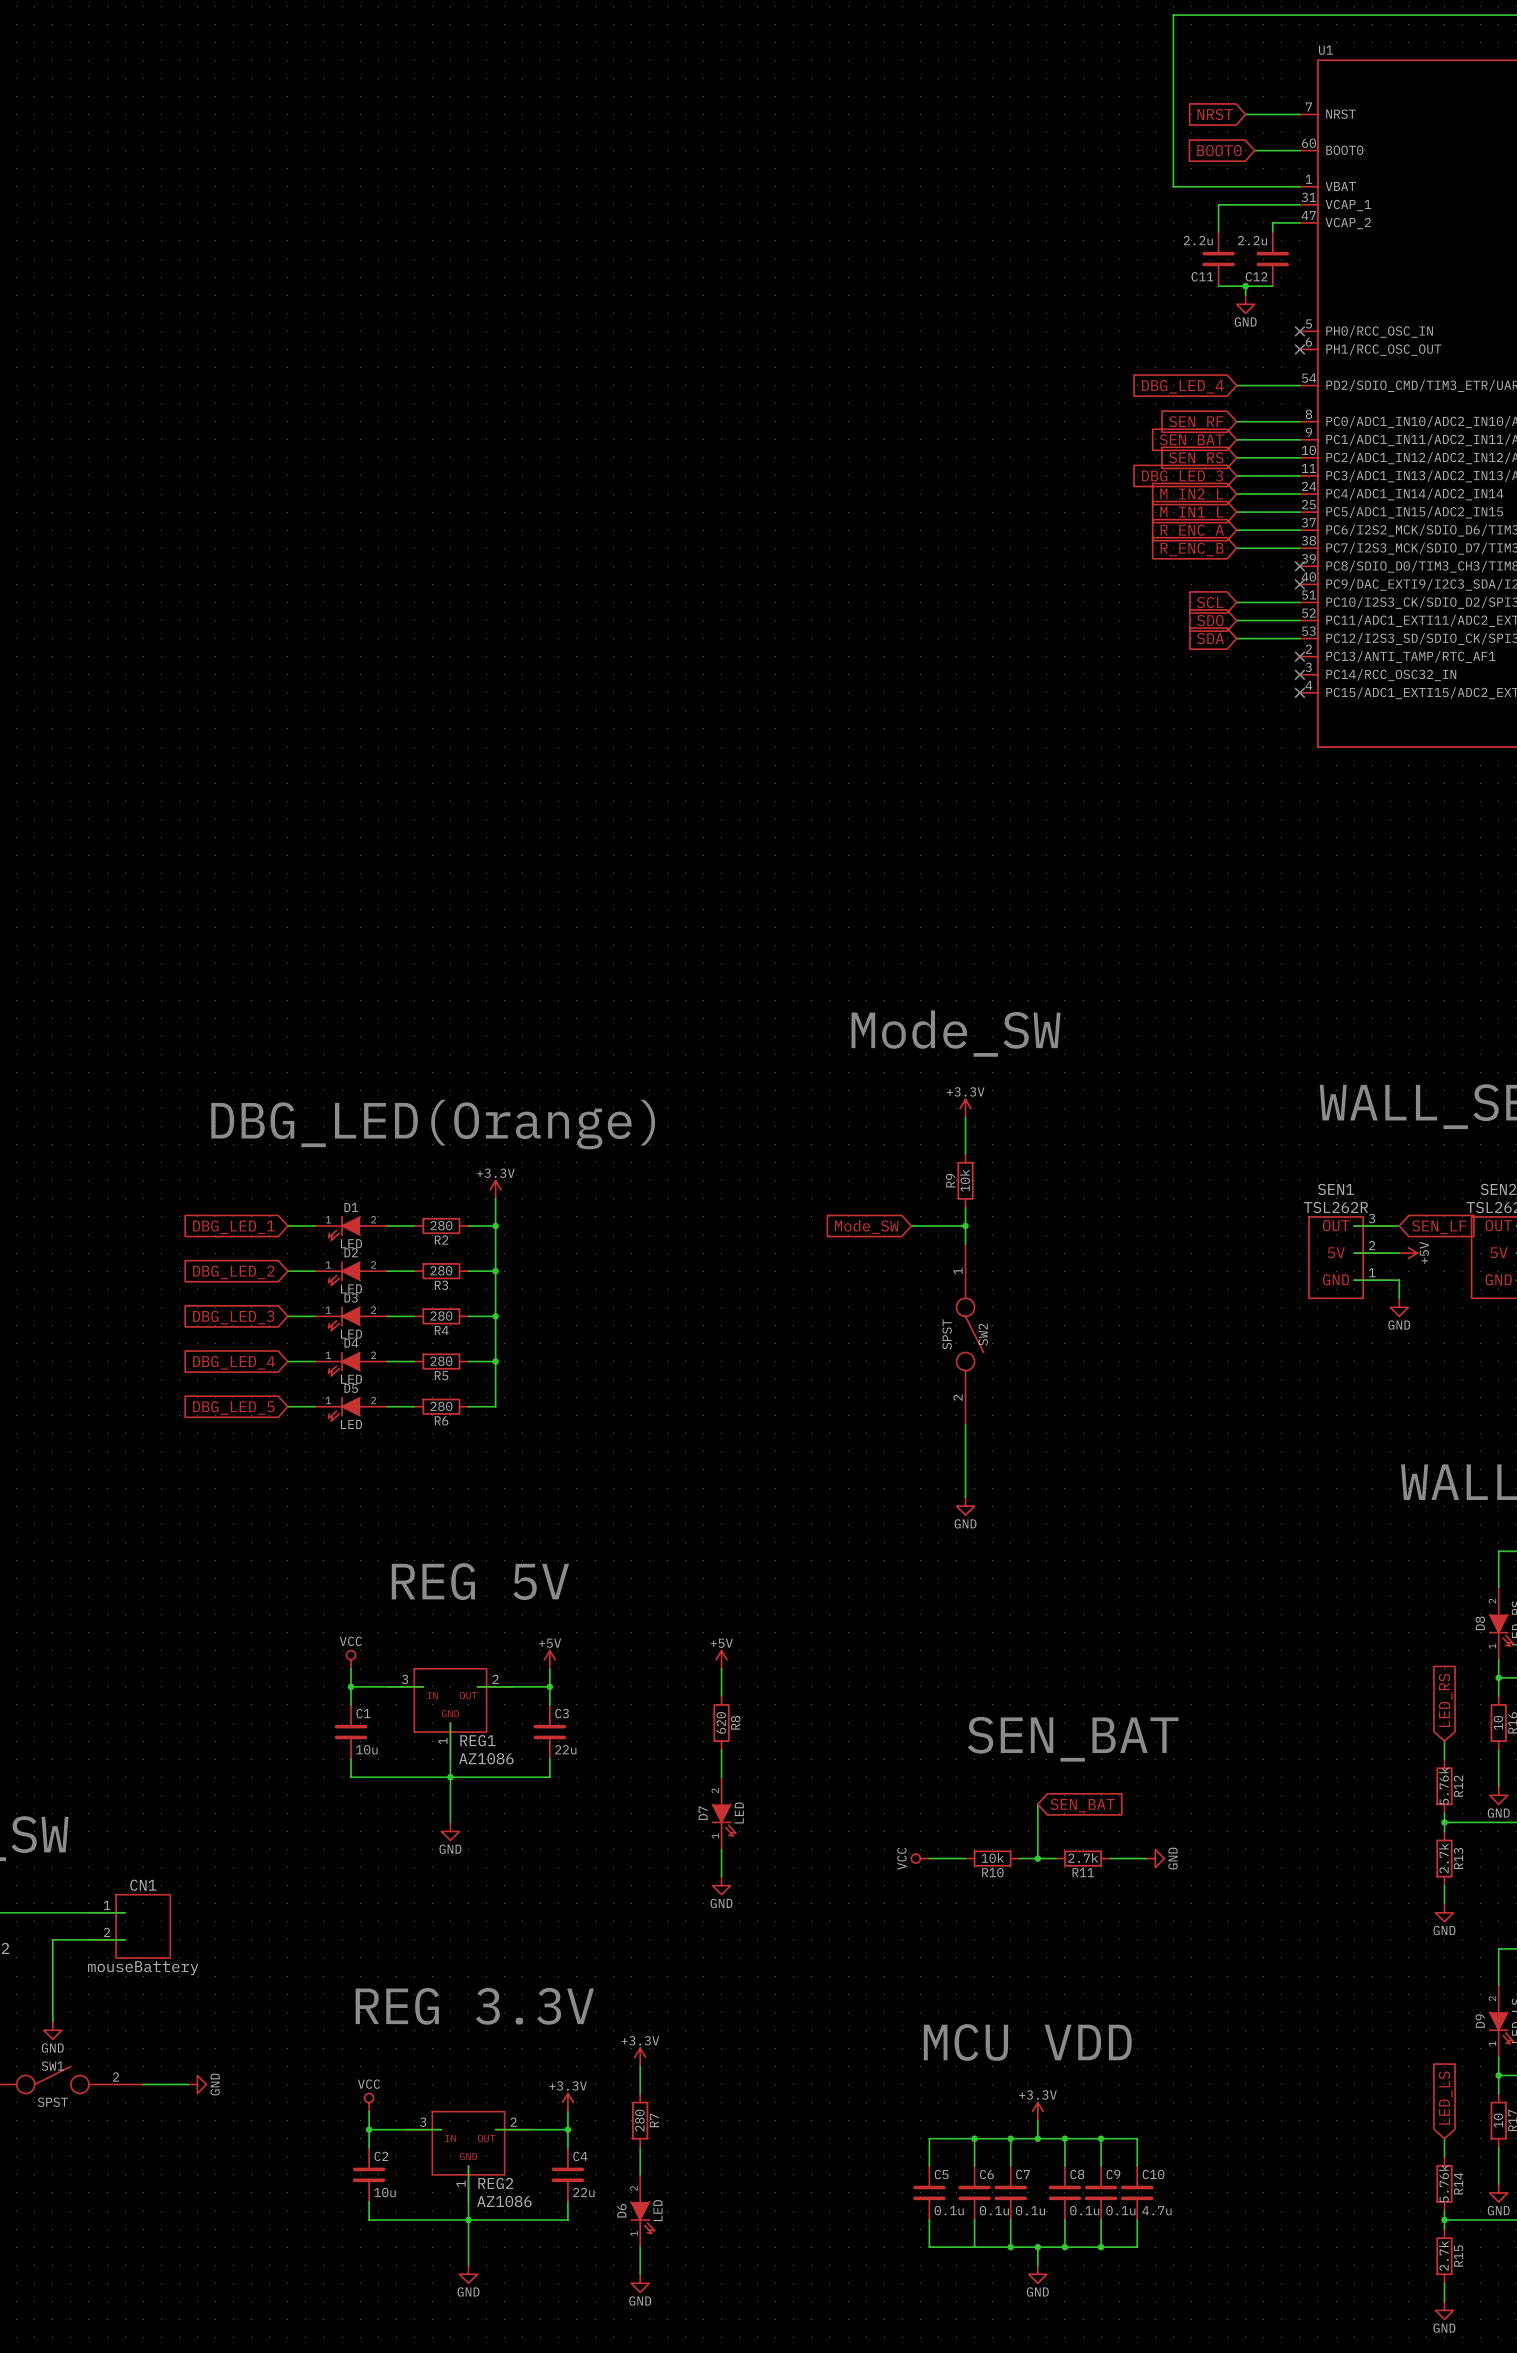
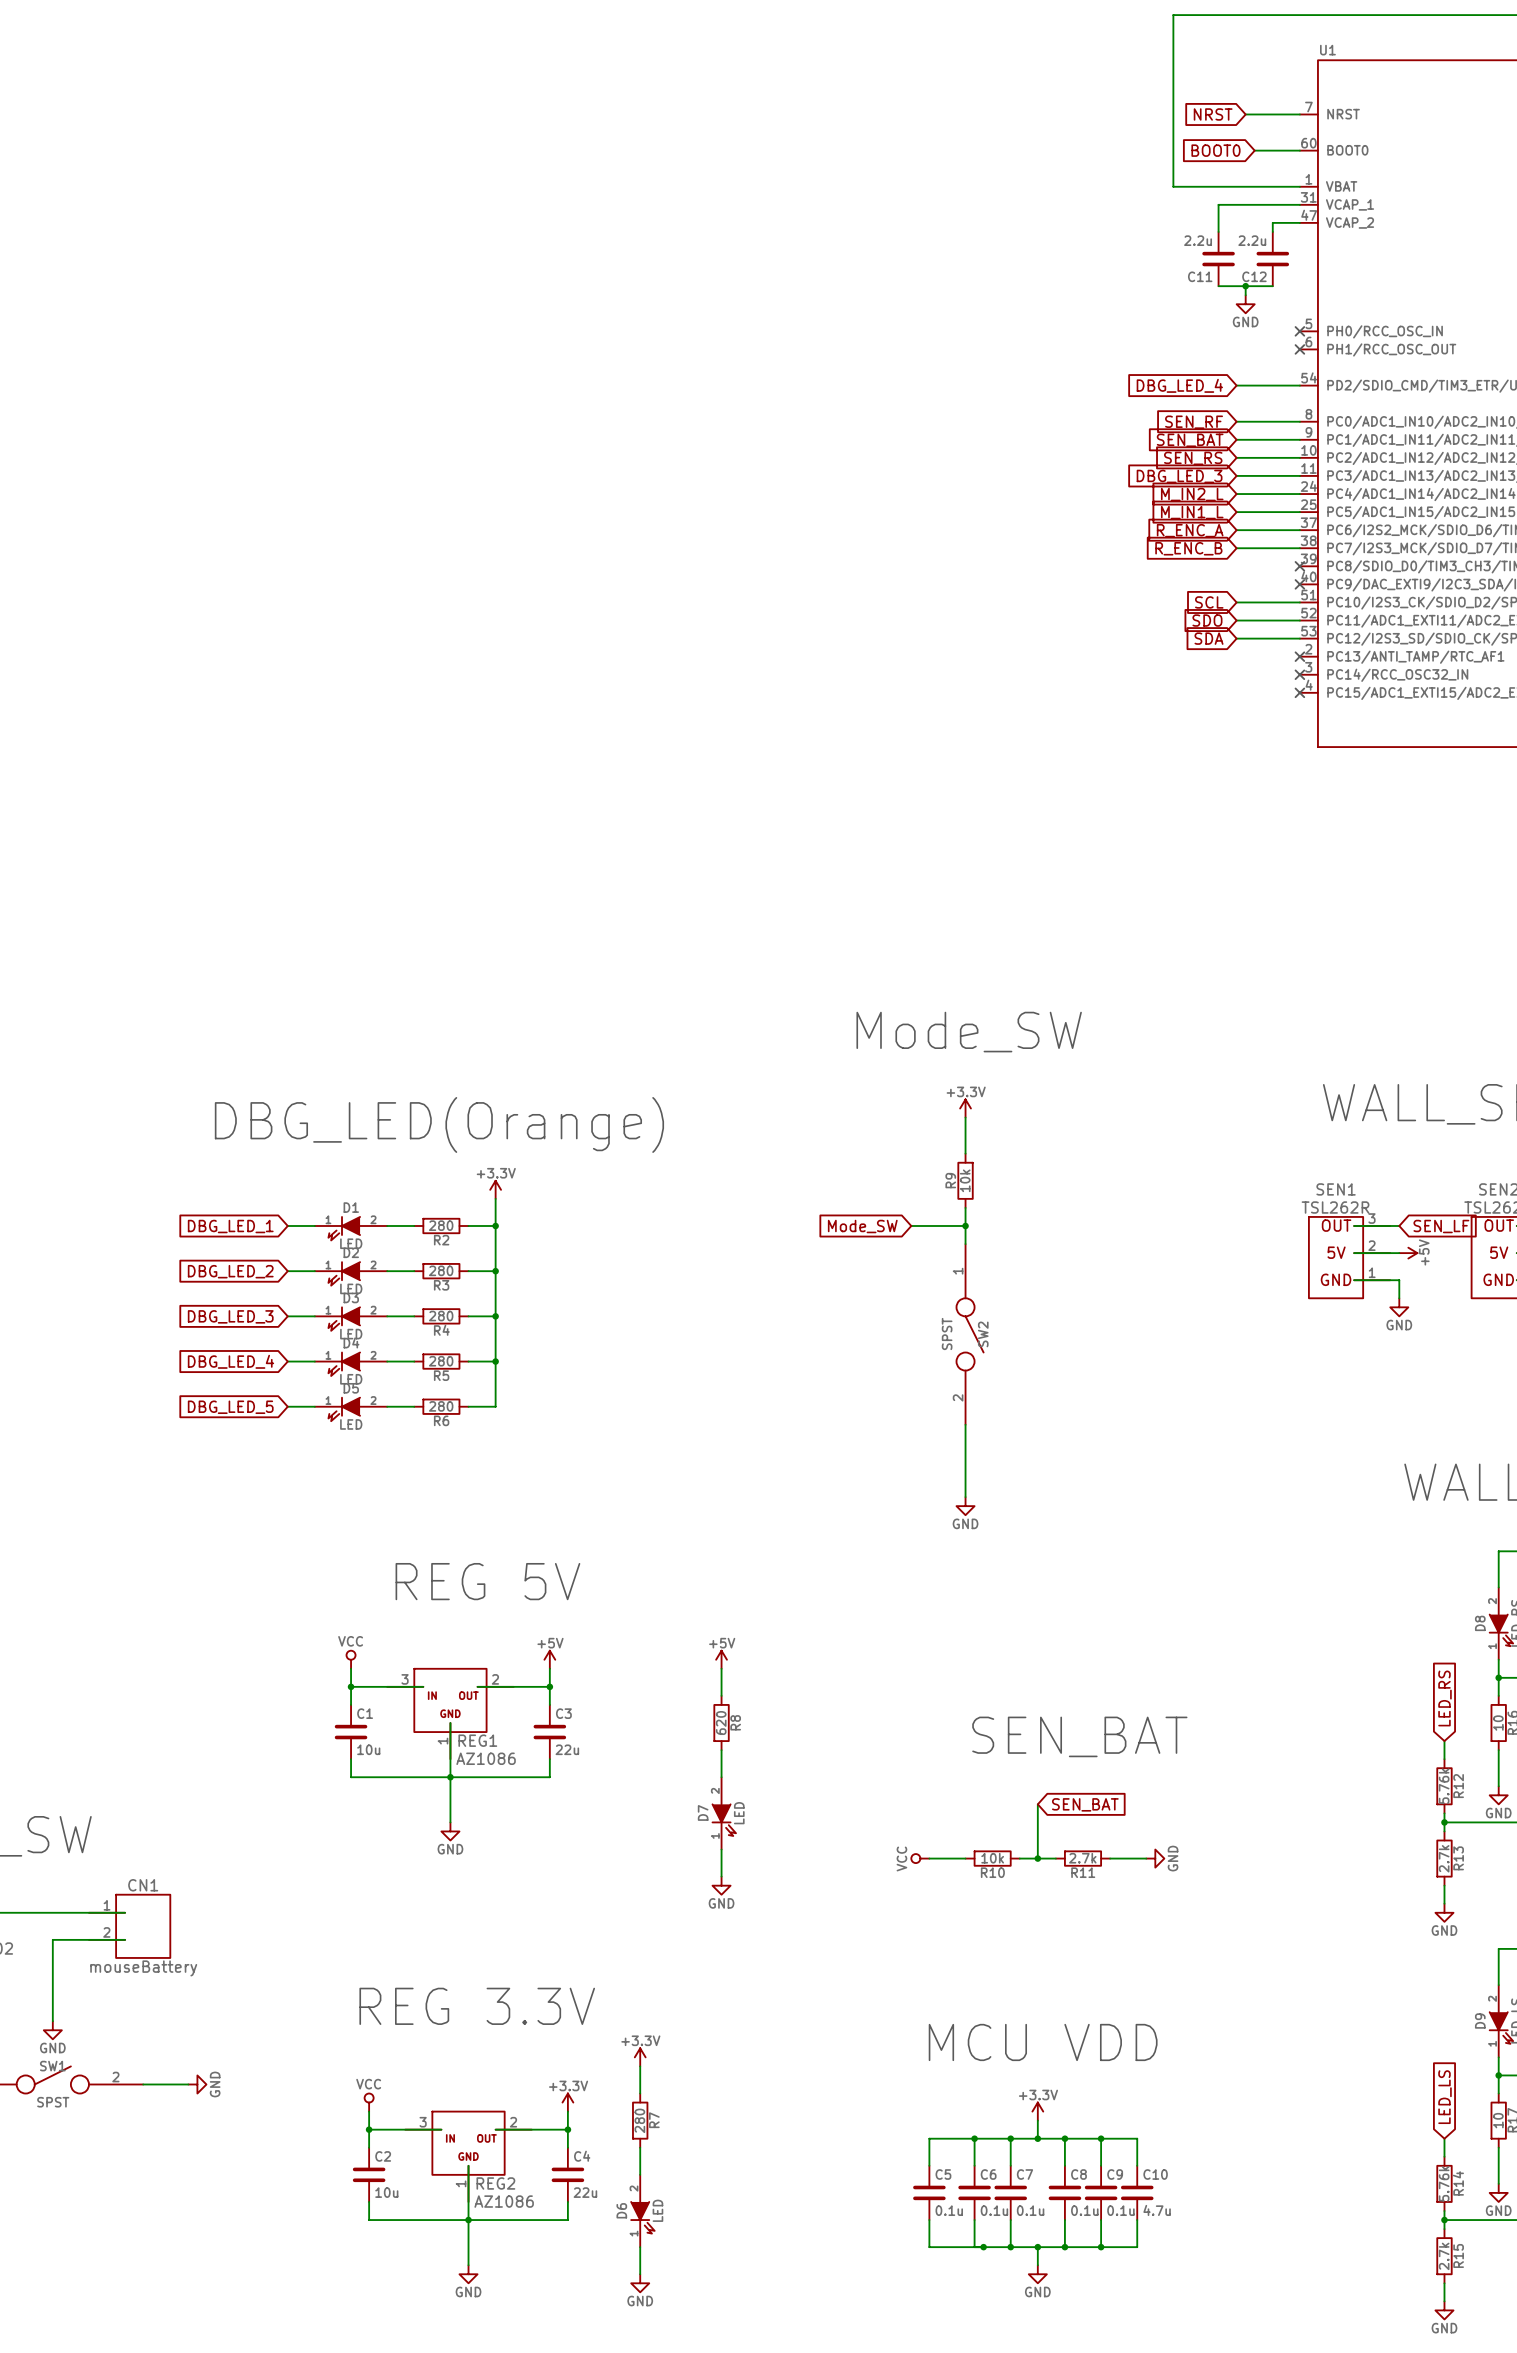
junction: none -> (983, 2247)

